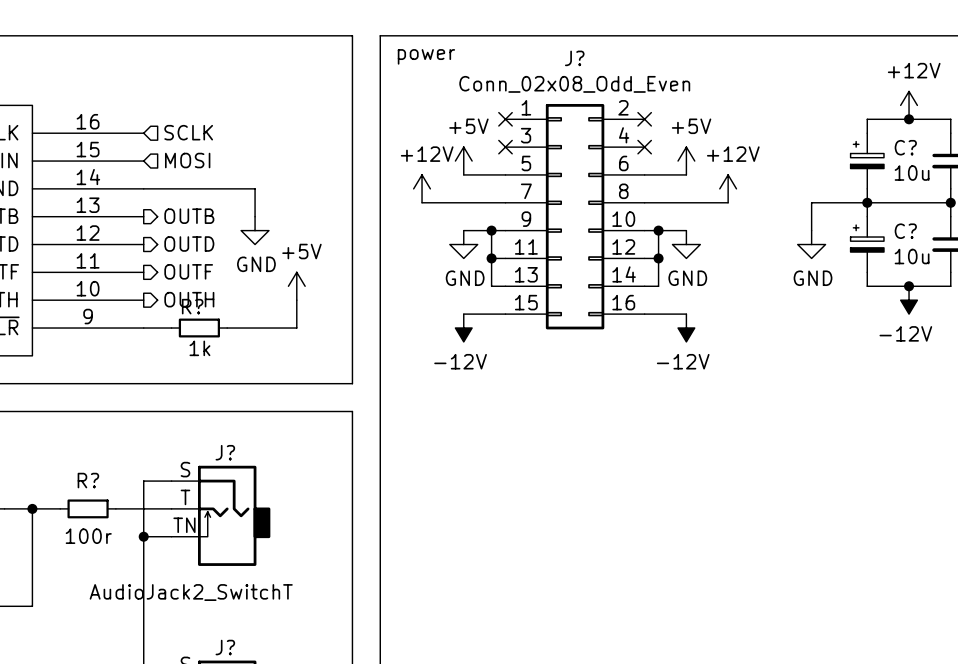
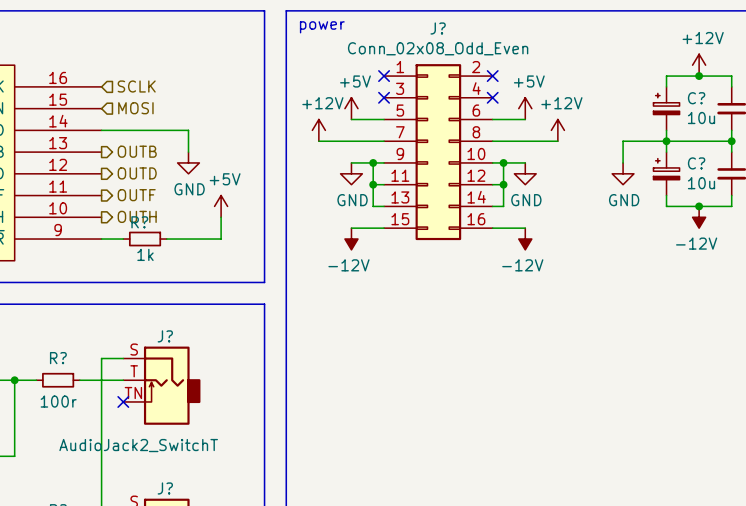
wire: (143, 536) (171, 536) -> none
junction: (143, 536) -> none
no-connect mark: none -> (123, 401)

